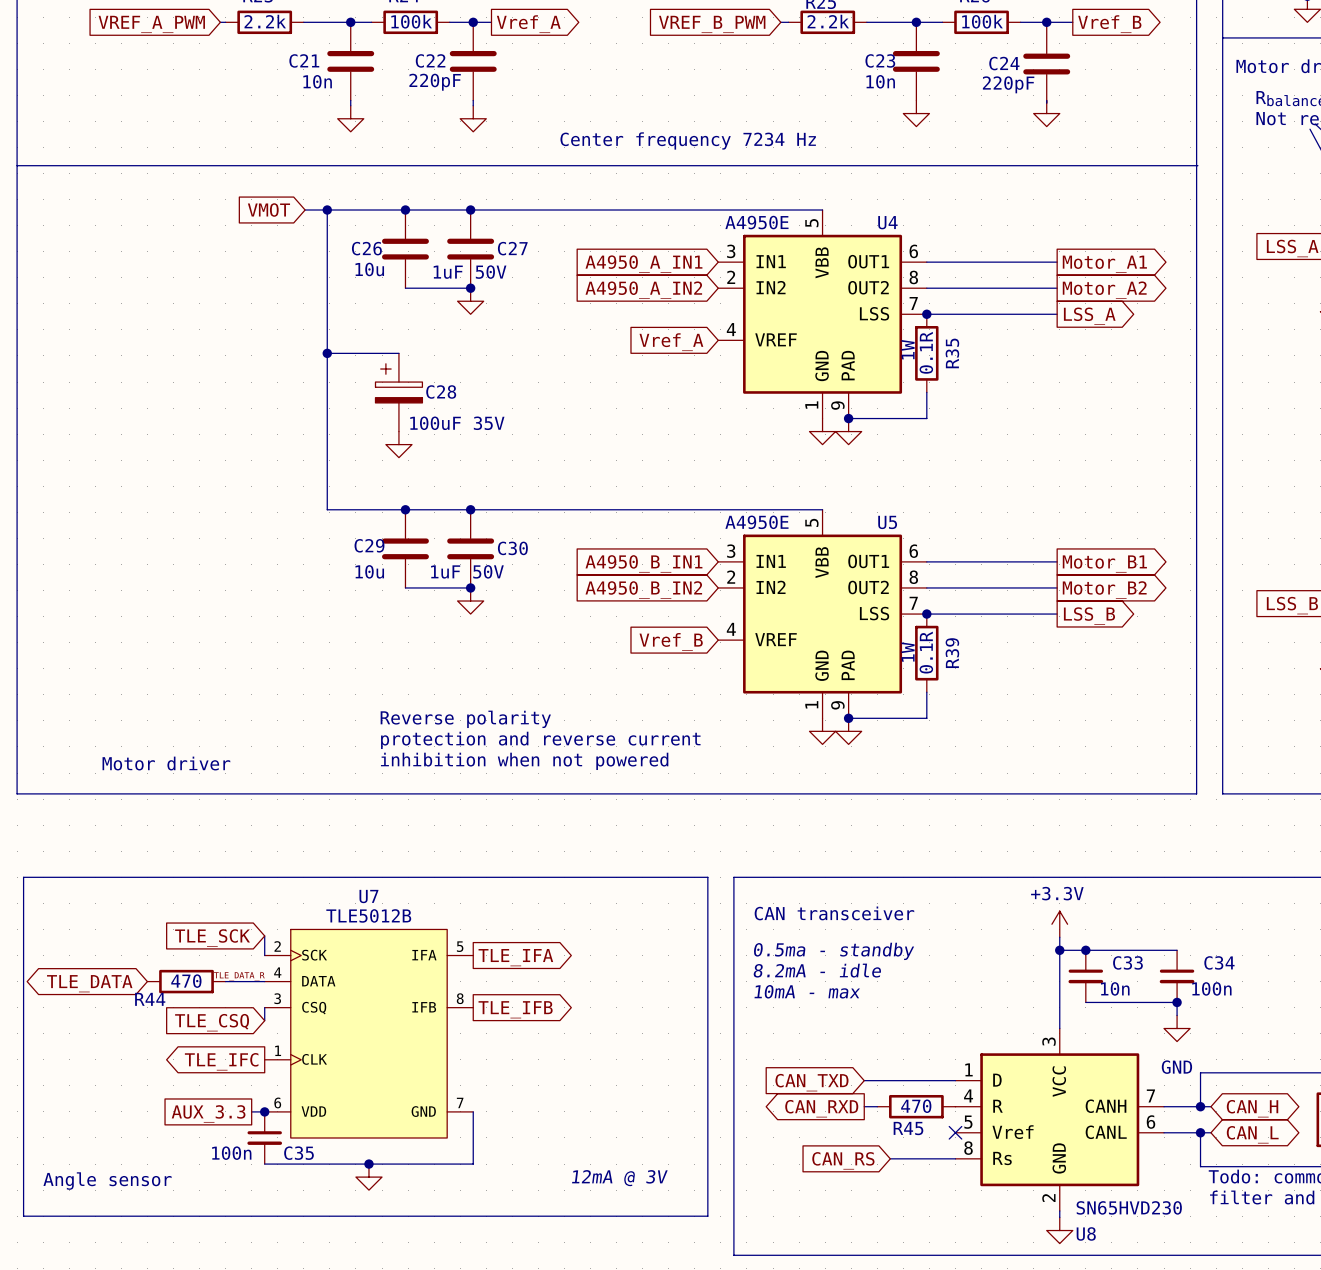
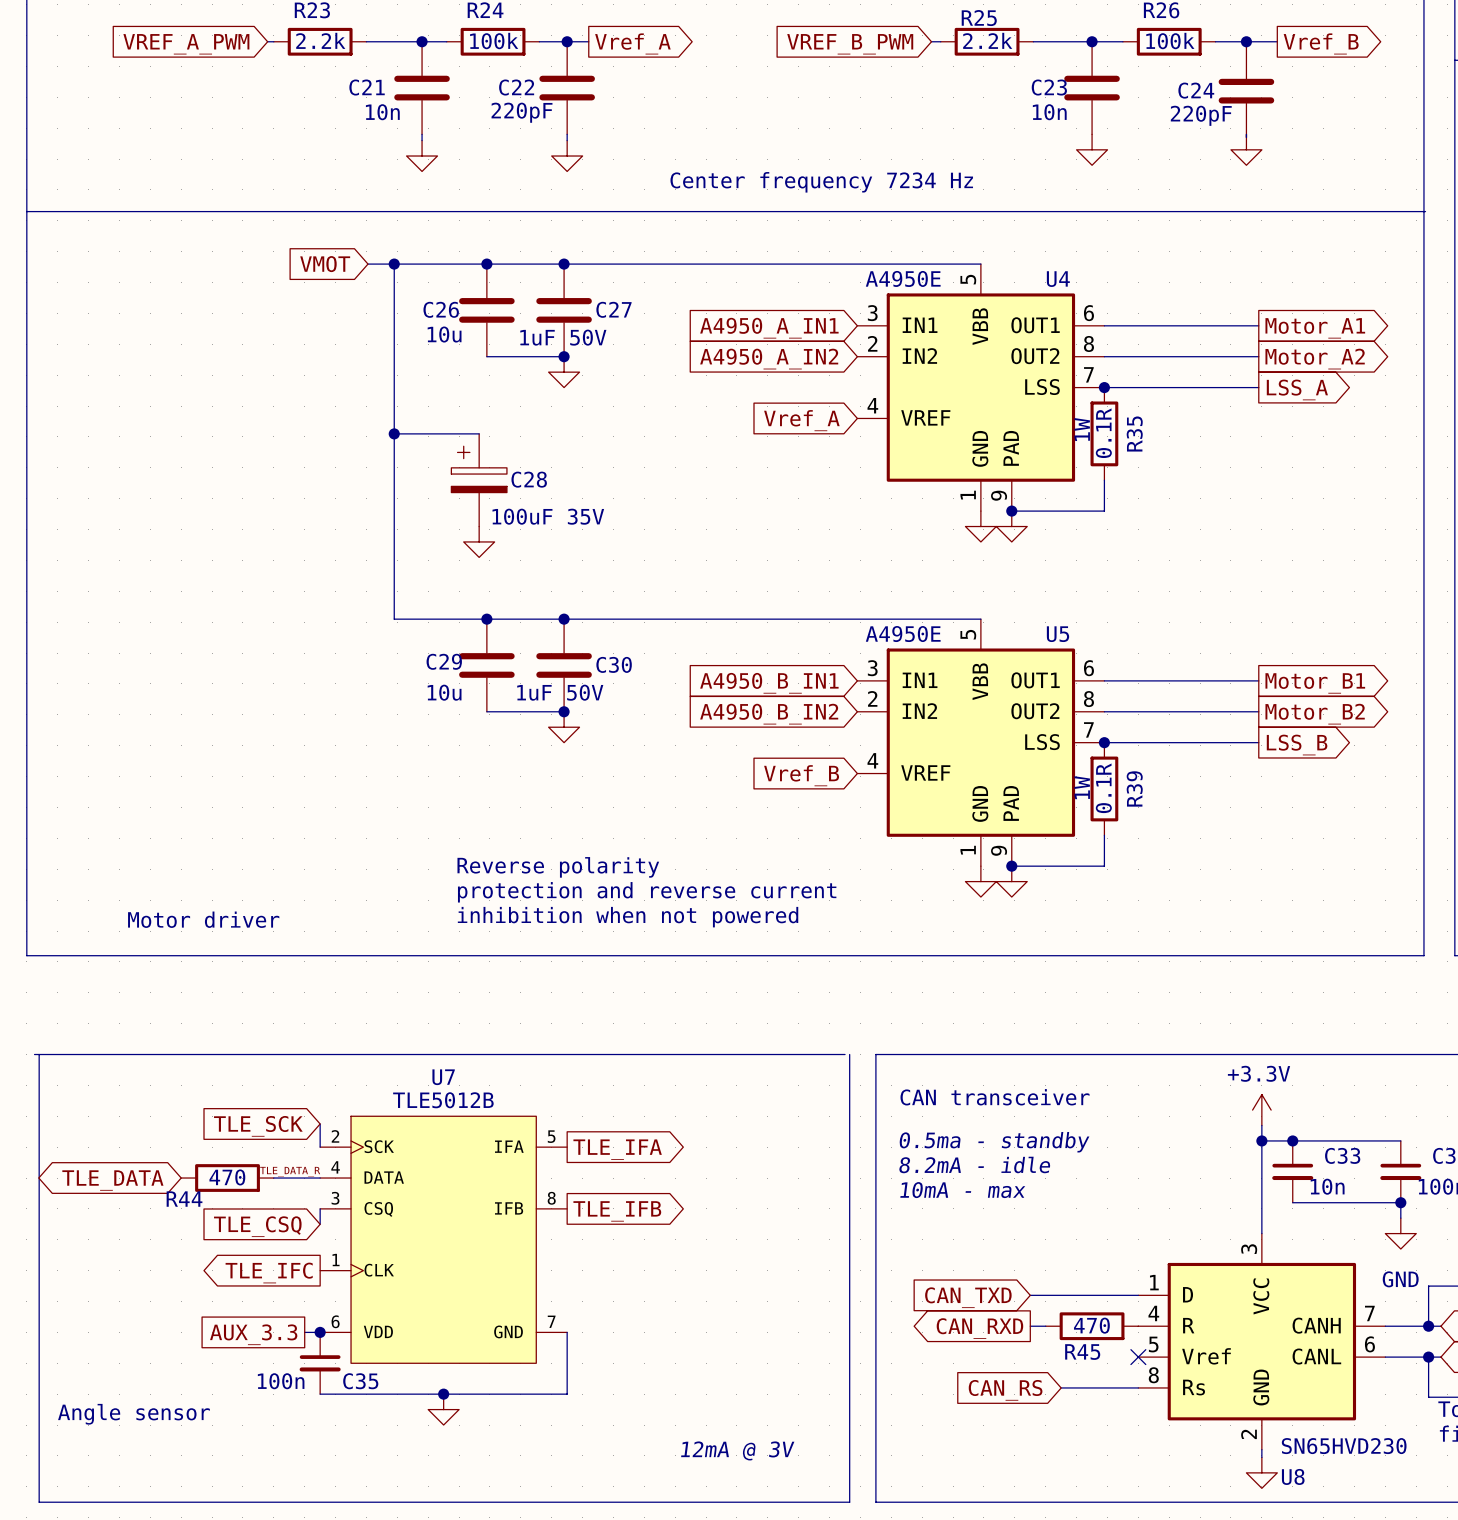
line: (23, 877) (23, 1216) (707, 1216) (707, 877) -> none
line: none -> (39, 1054) (39, 1502) (849, 1502) (849, 1054)
text position: 12mA @ 3V (619, 1178) -> 12mA @ 3V (737, 1450)

